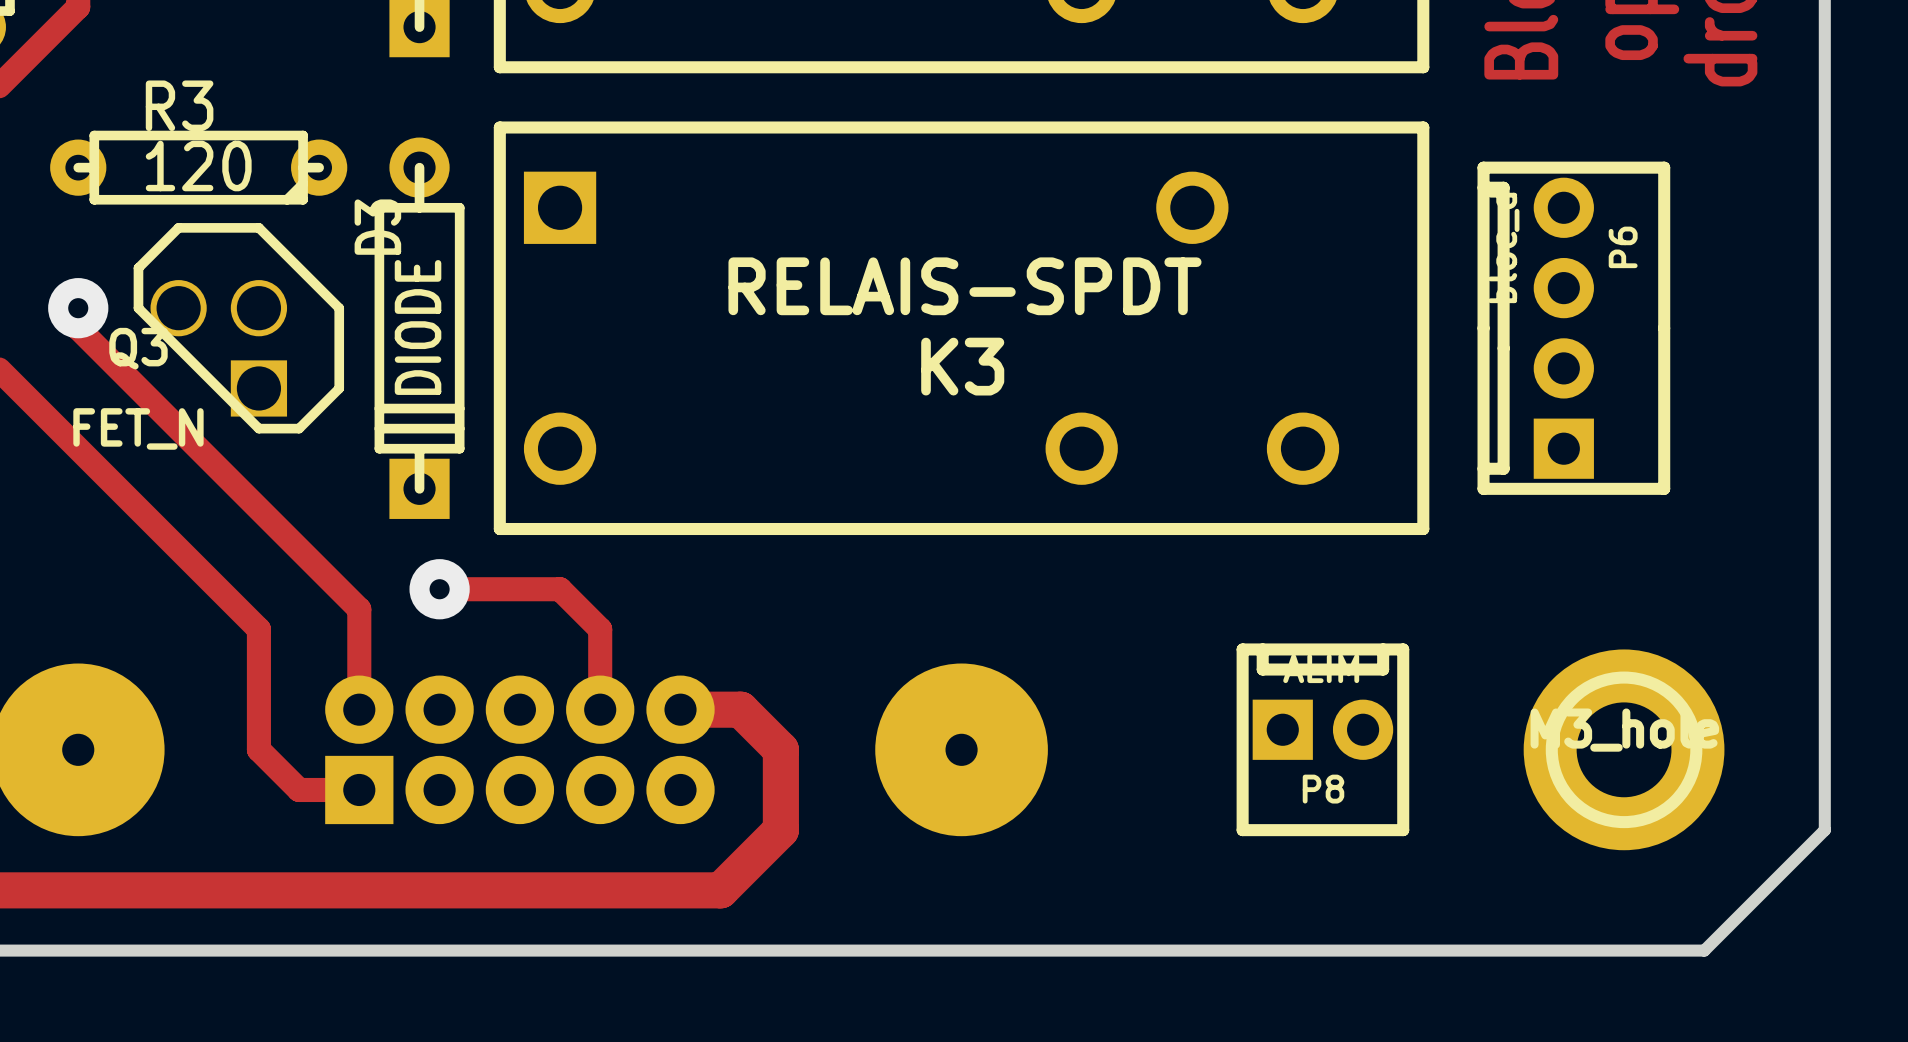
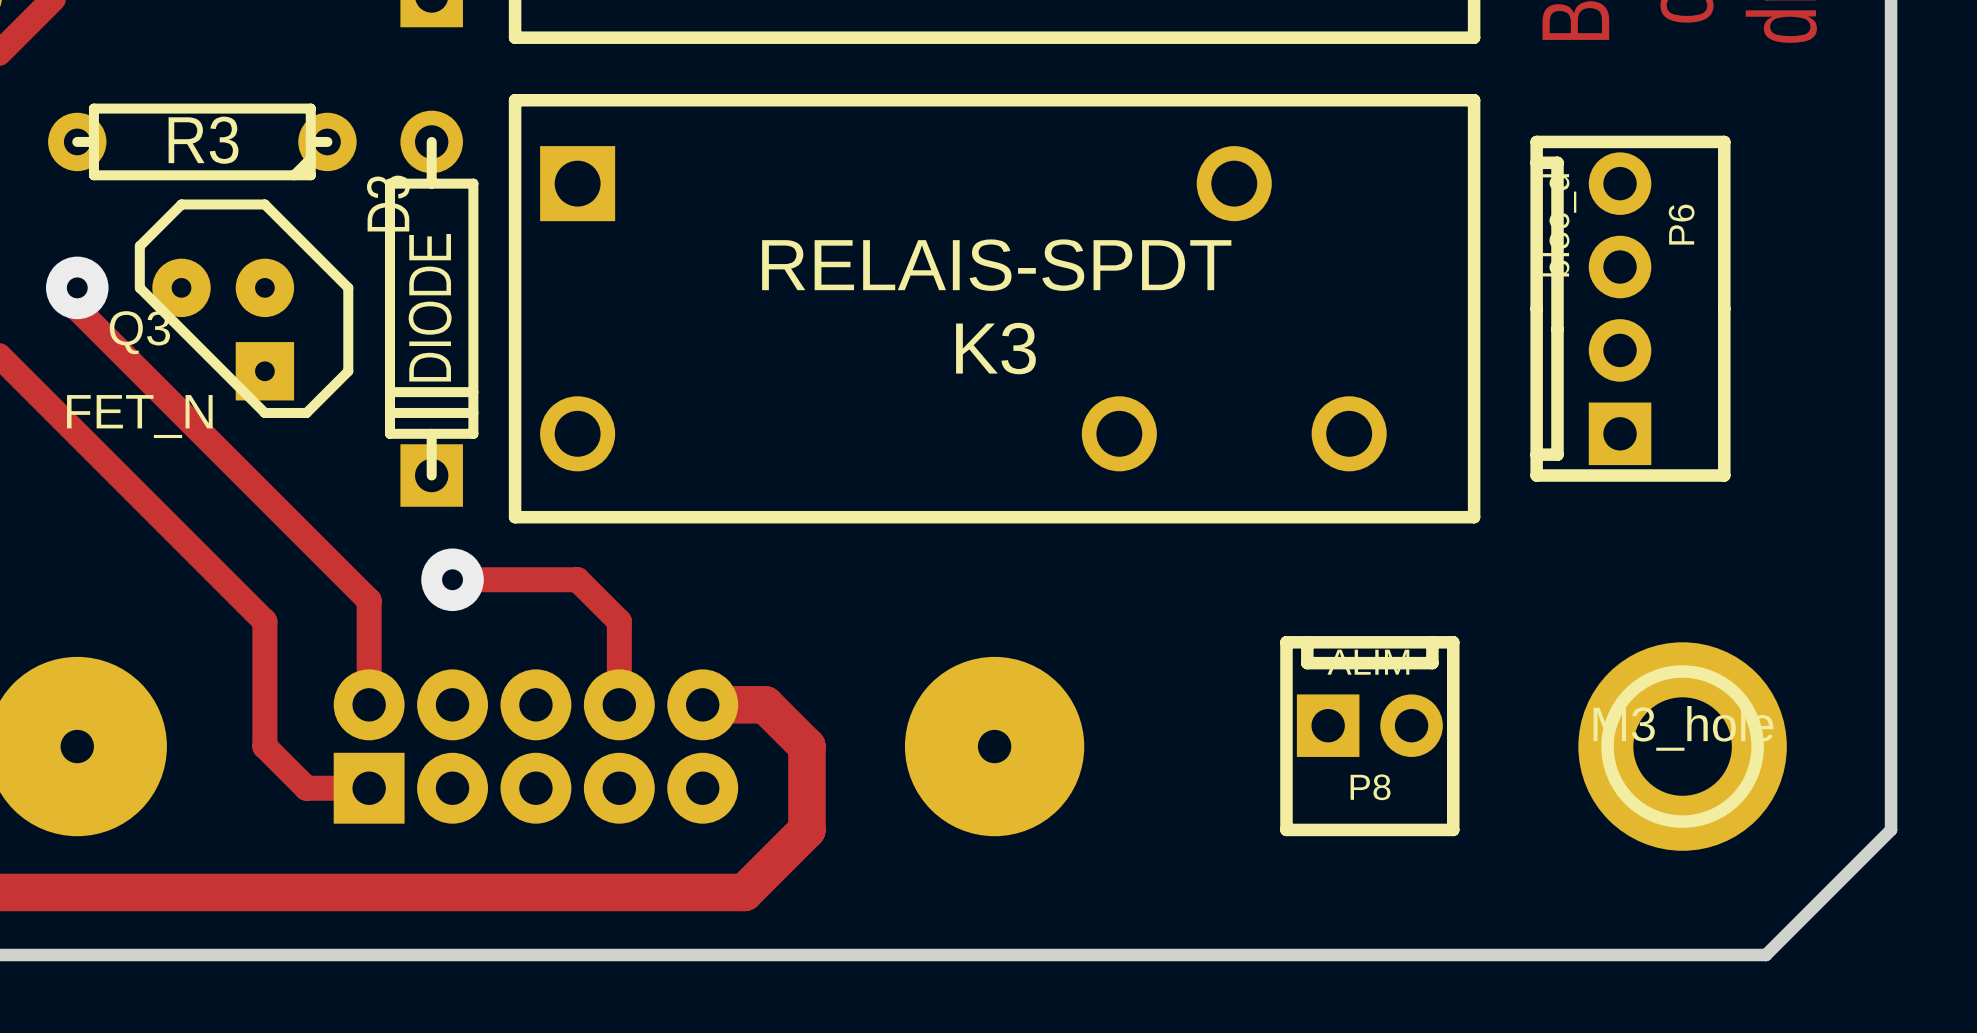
R3 name position: R3 (179, 105) -> R3 (203, 140)
R3 value: 120 (198, 165) -> none
Q3 footprint: [133, 223, 345, 434] -> [134, 199, 354, 418]

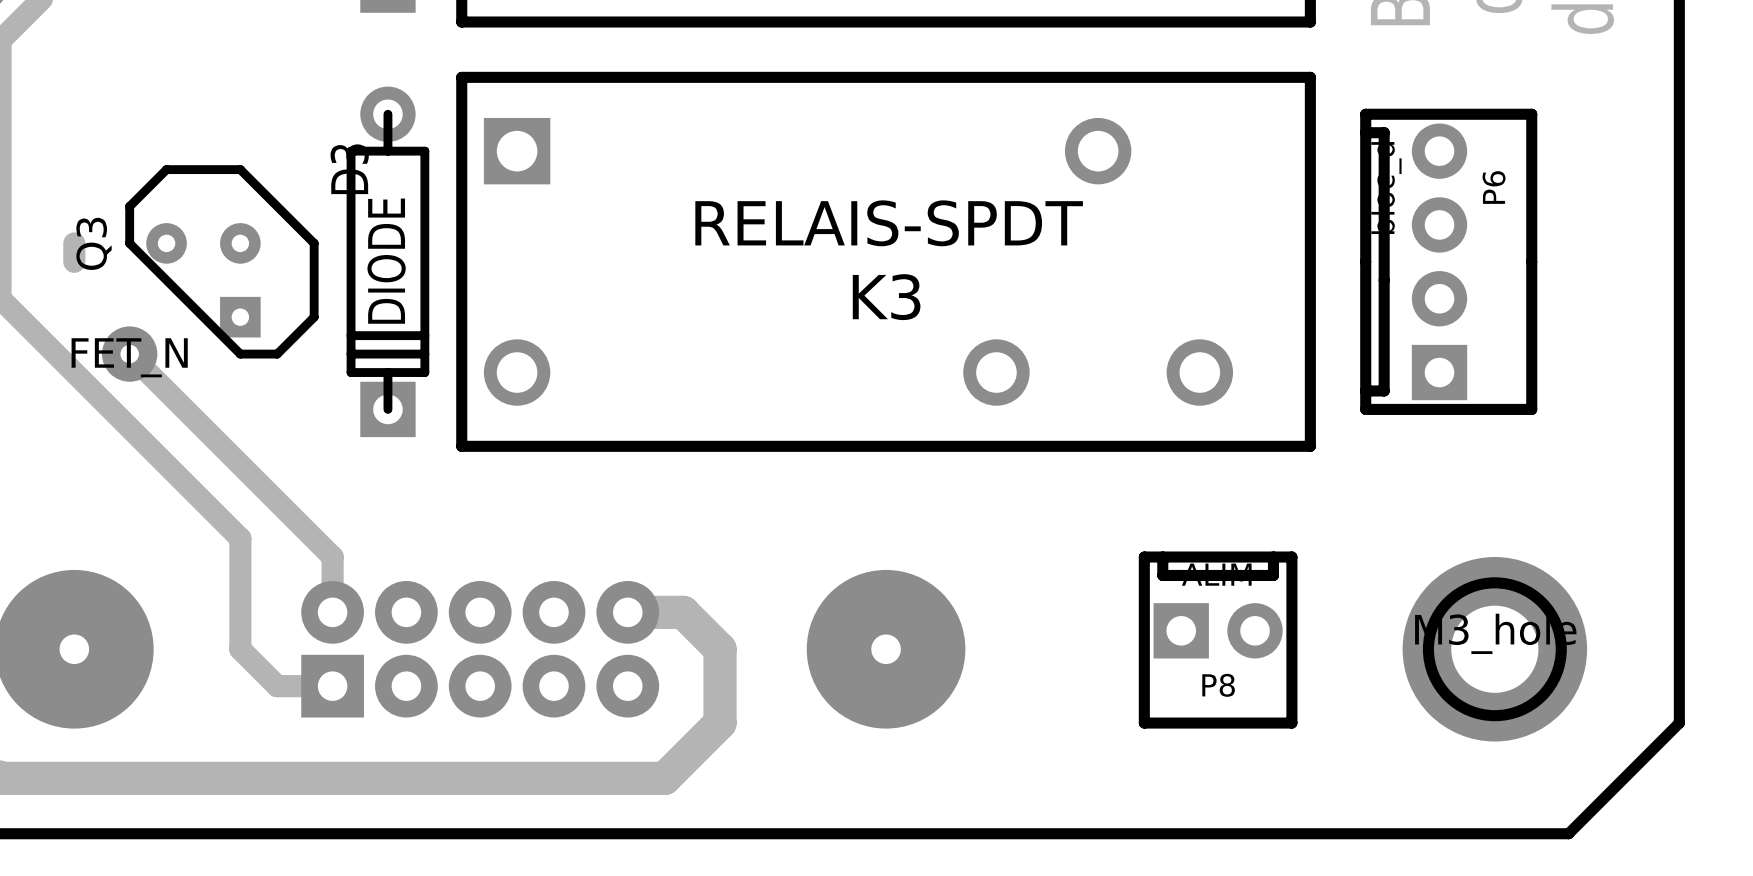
R3: (202, 141) -> none
Q3 footprint: [134, 199, 354, 418] -> [125, 165, 319, 359]
via: (77, 287) -> none
track: (77, 308) (369, 600) (369, 642) -> (129, 354) (332, 557)
Q3 name rotation: 0° (139, 332) -> 90° counterclockwise (94, 243)
via: none -> (129, 354)
track: (452, 579) (577, 579) (619, 621) (619, 704) -> none
via: (452, 579) -> none

